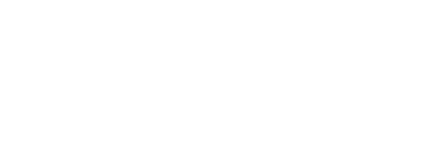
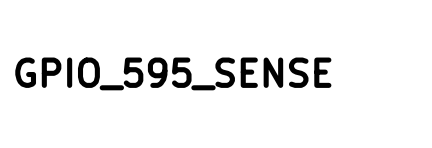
label: none -> GPIO_595_SENSE (173, 73)

